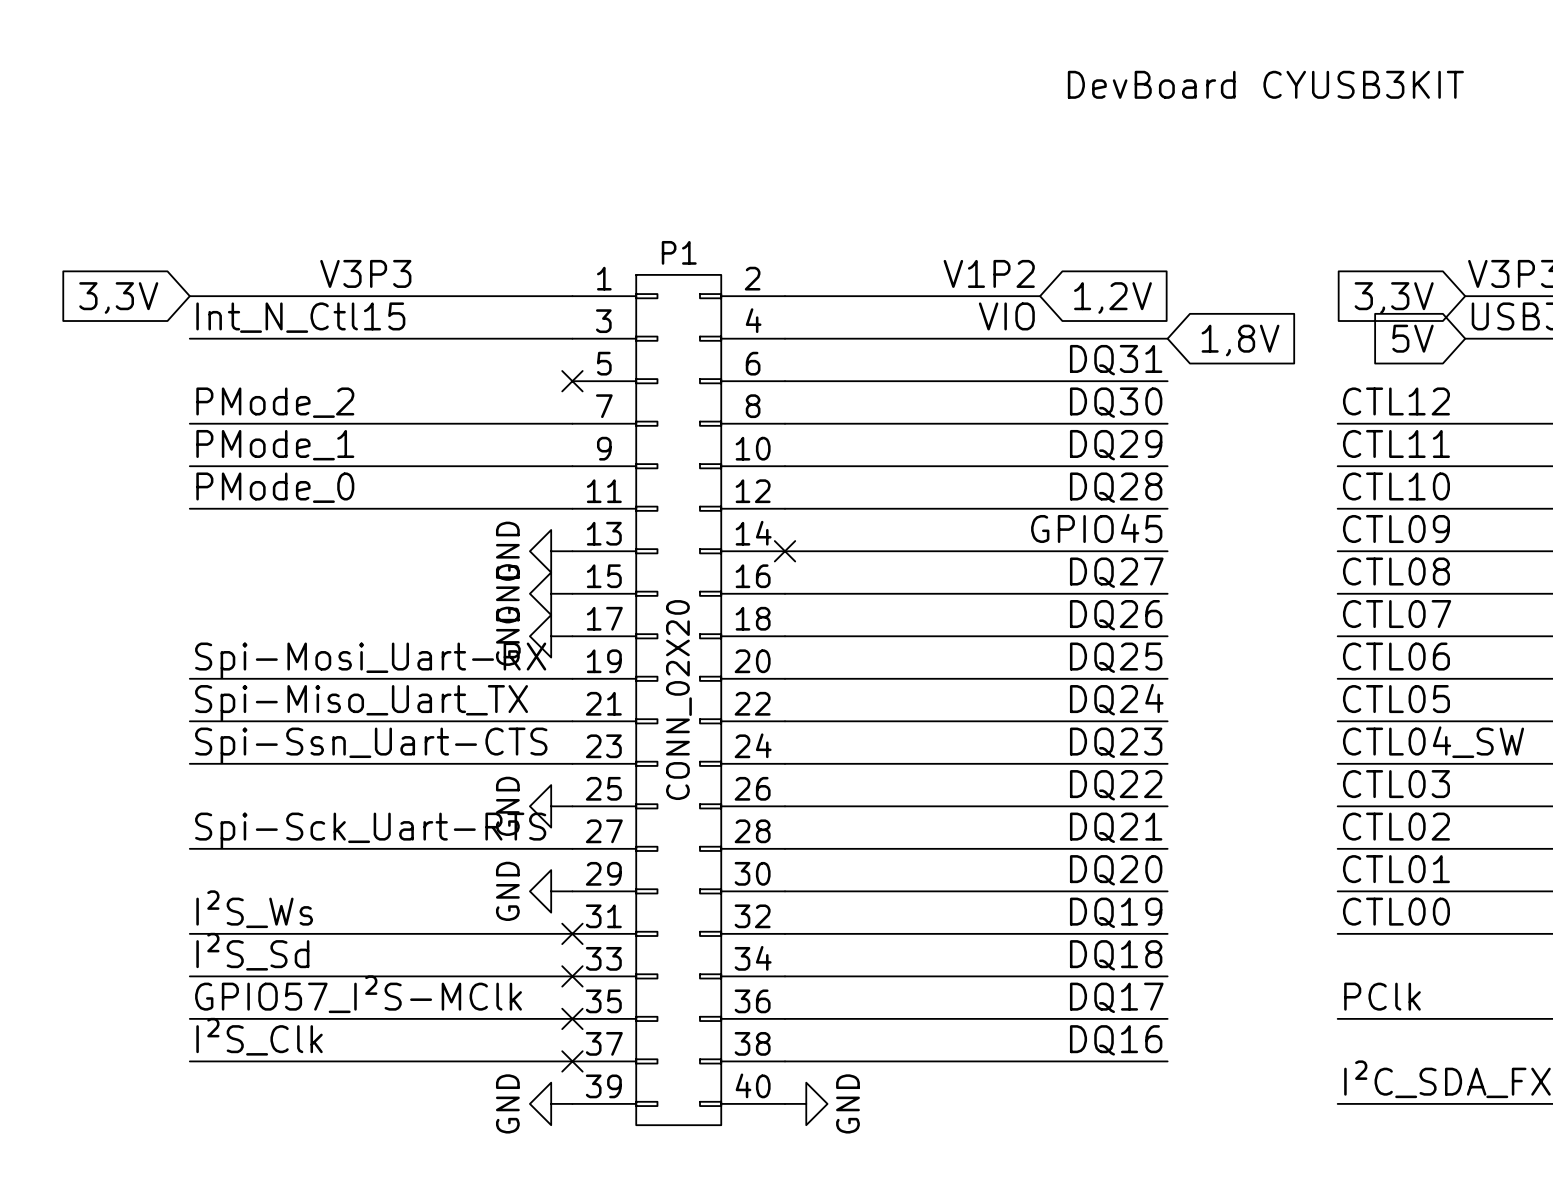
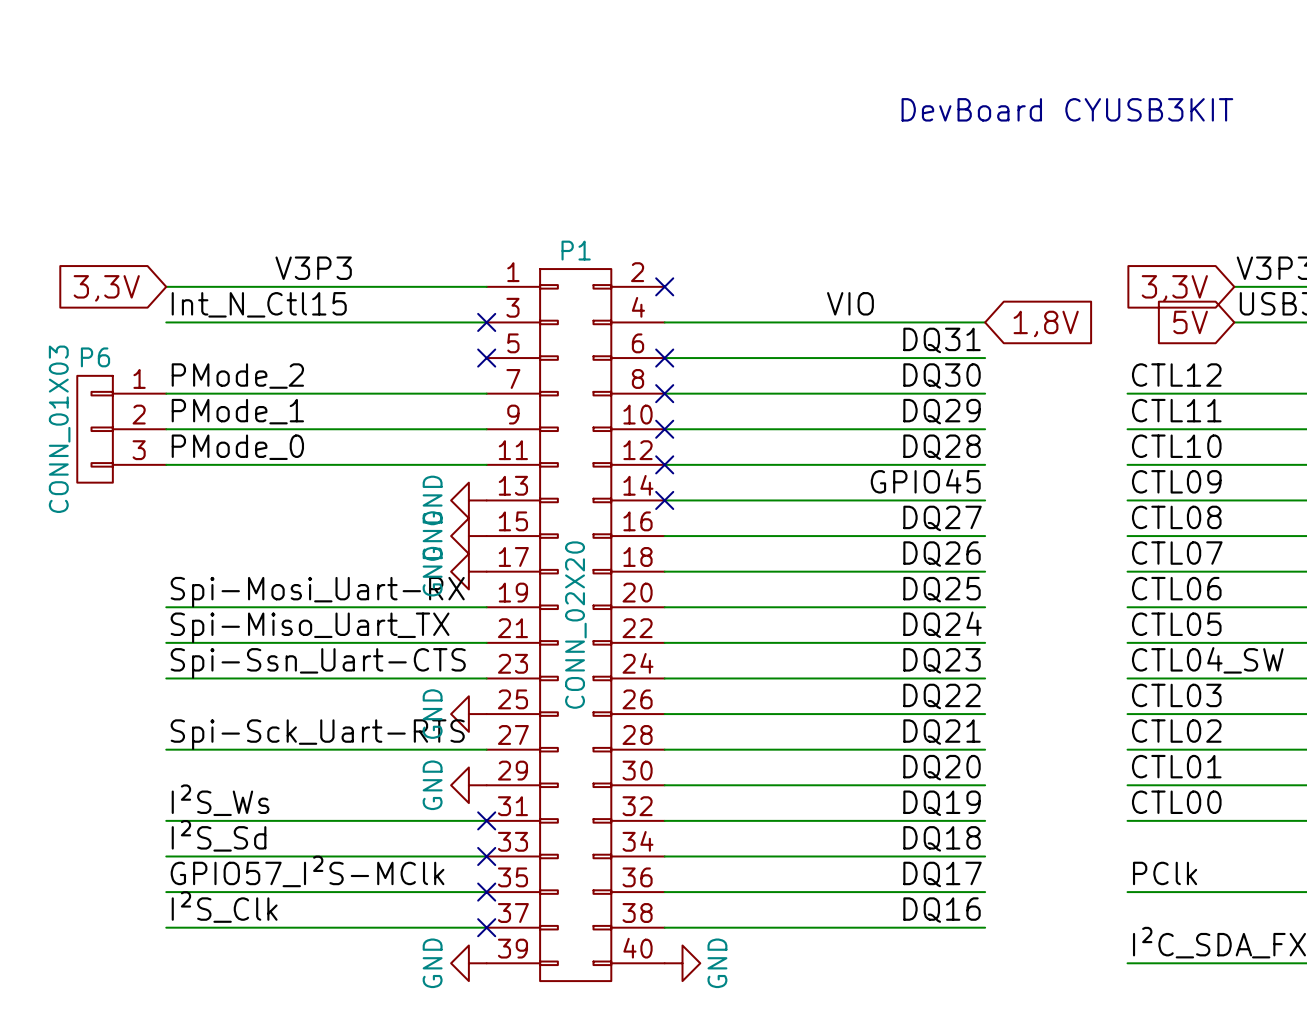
label: V1P2 (989, 273) -> none
wire: (785, 296) (1040, 296) -> none
no-connect mark: none -> (664, 286)
global label: 1,2V (1112, 297) -> none
no-connect mark: none -> (486, 322)
no-connect mark: none -> (664, 358)
no-connect mark: none -> (664, 393)
P6: none -> CONN_01X03 (121, 429)
no-connect mark: none -> (664, 429)
no-connect mark: none -> (664, 464)

